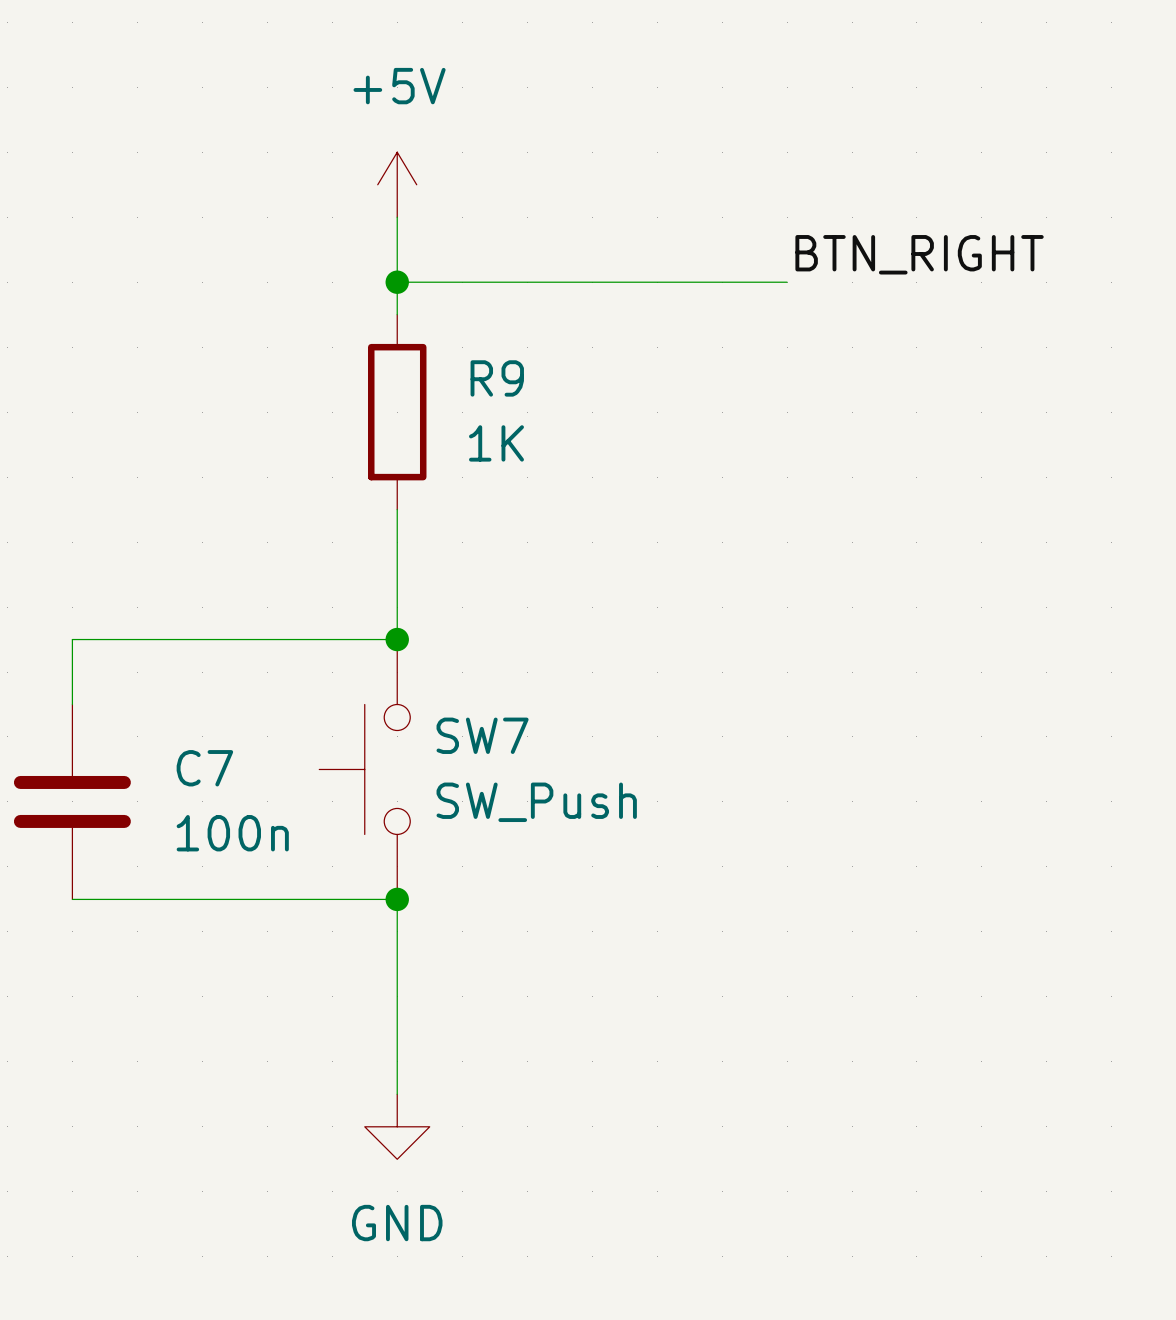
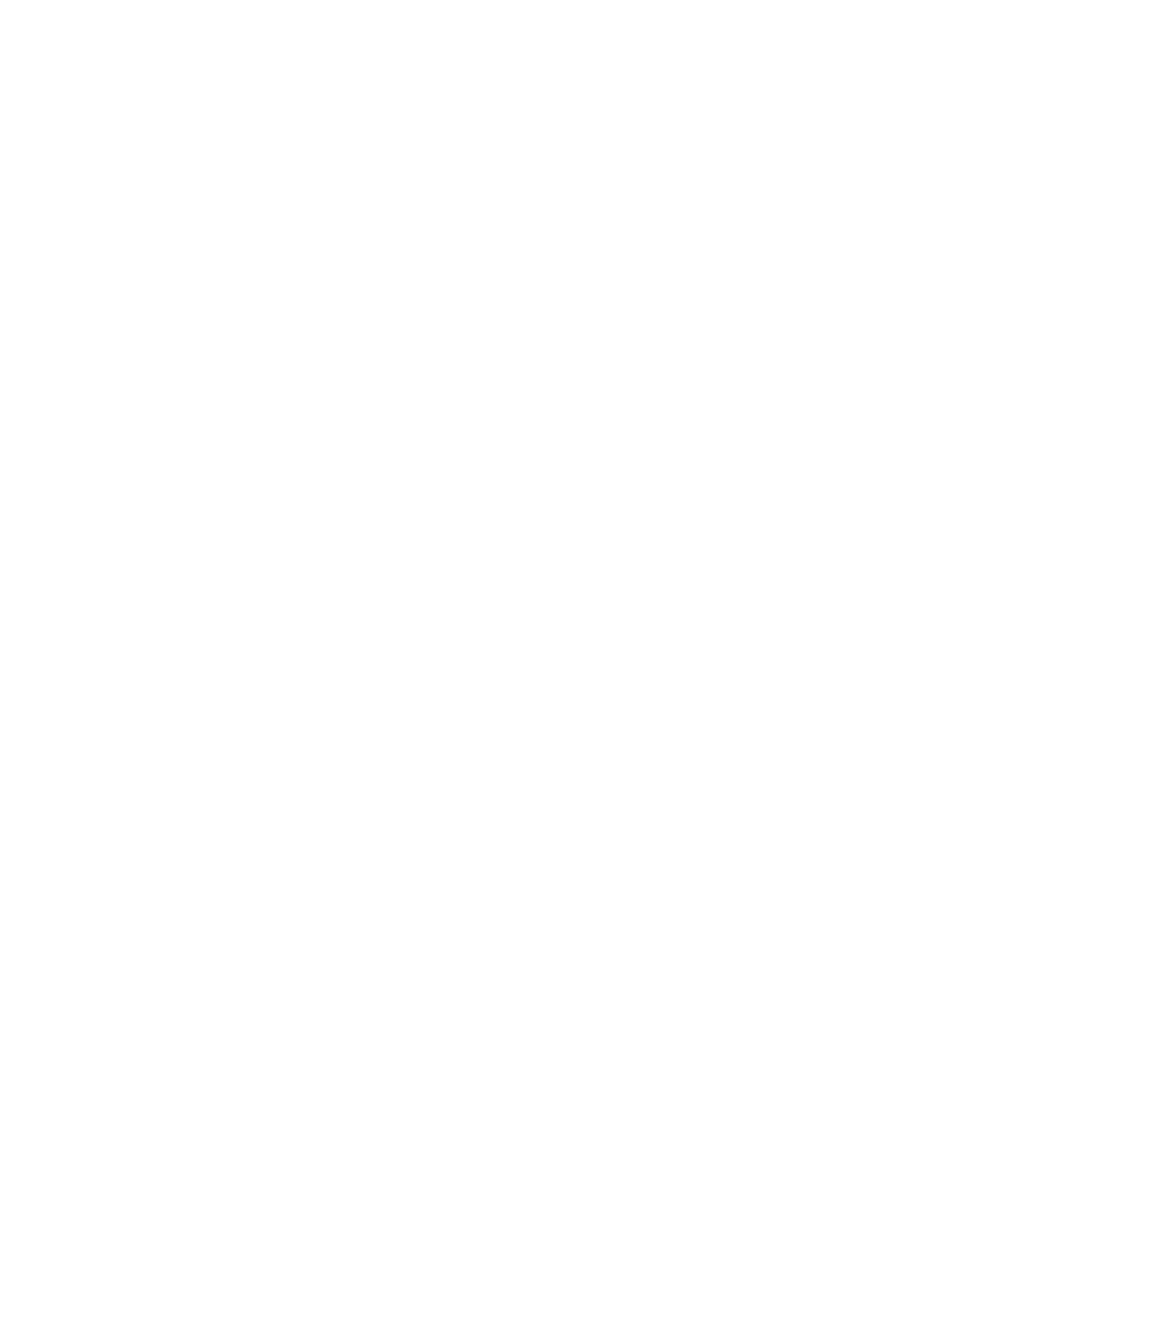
power symbol: +5V (397, 184) -> none
wire: (397, 217) (397, 314) -> none
label: BTN_RIGHT (919, 254) -> none
wire: (397, 282) (787, 282) -> none
junction: (397, 282) -> none
R9: 1K (397, 412) -> none
wire: (397, 509) (397, 639) (72, 639) (72, 704) -> none
junction: (397, 639) -> none
SW7: SW_Push (364, 769) -> none
C7: 100n (72, 801) -> none
wire: (72, 899) (397, 899) (397, 1094) -> none
junction: (397, 899) -> none
power symbol: GND (397, 1126) -> none

